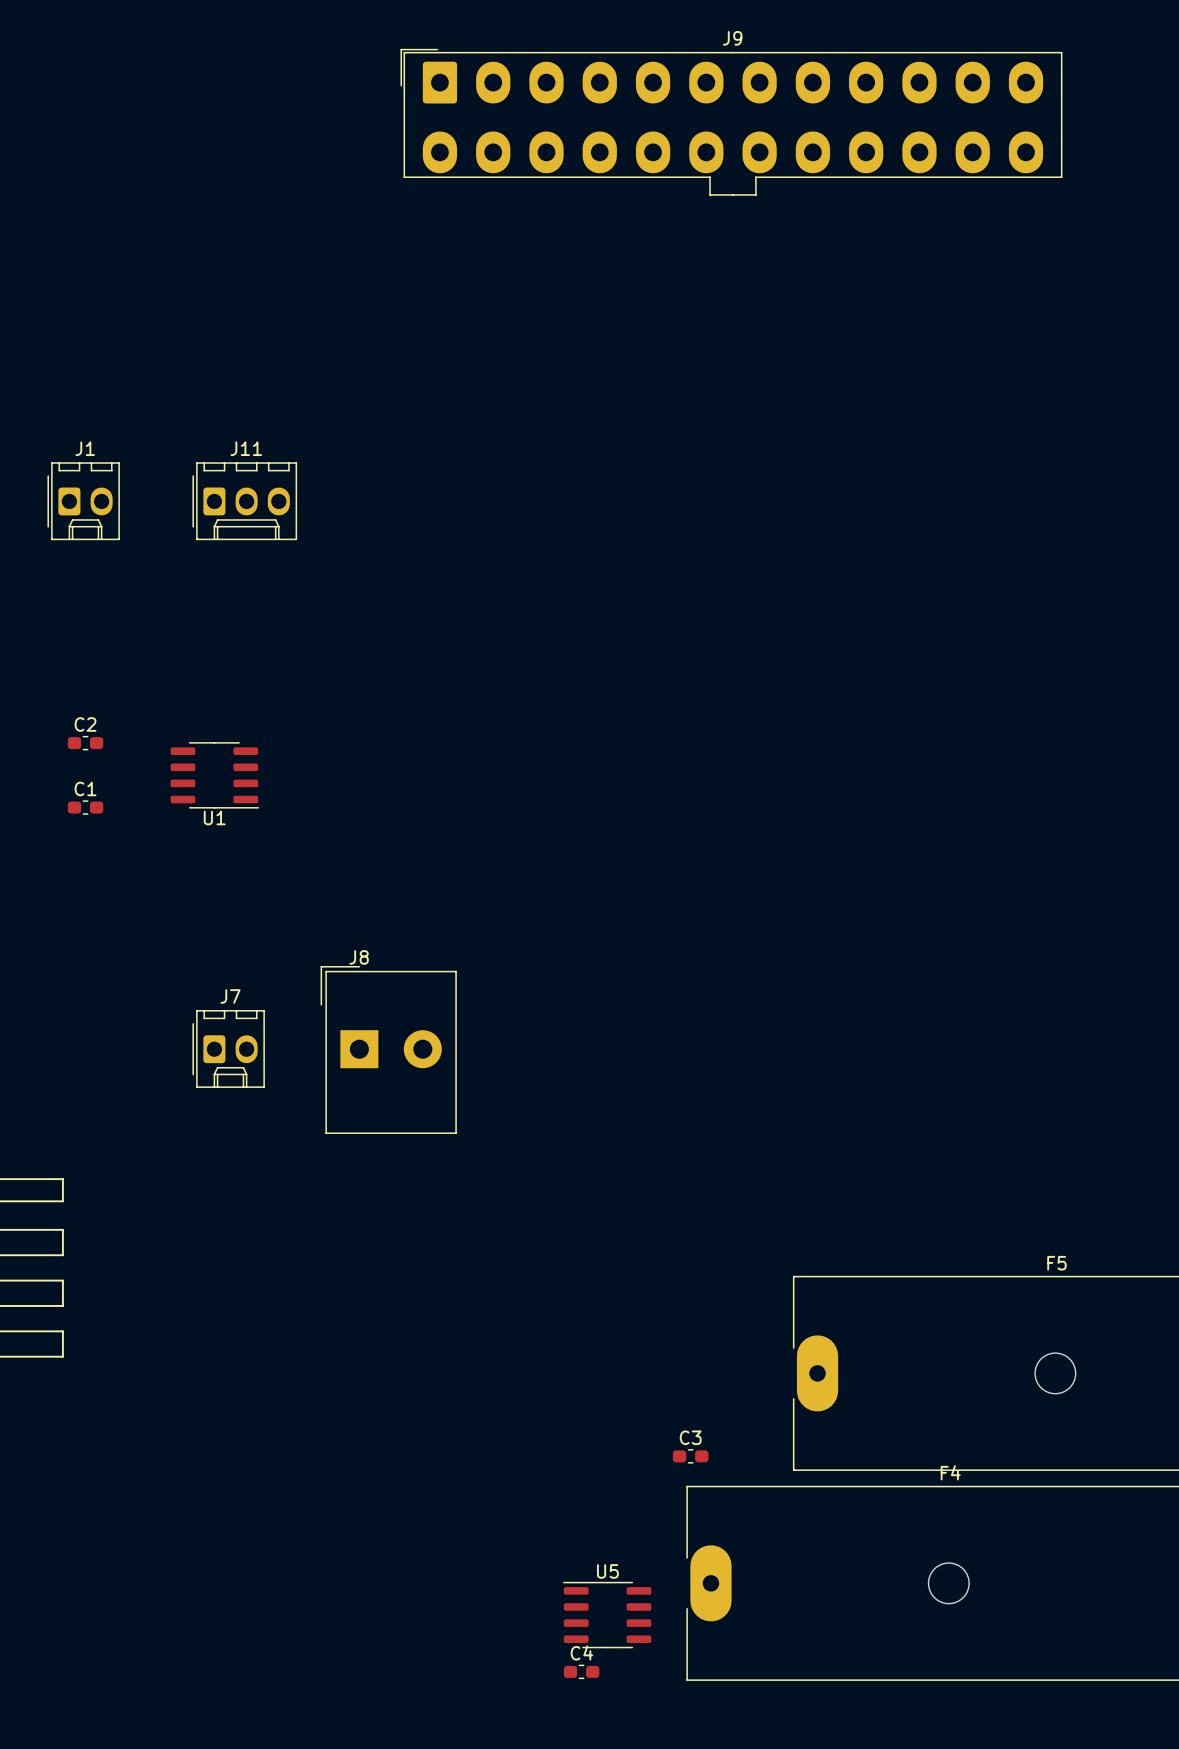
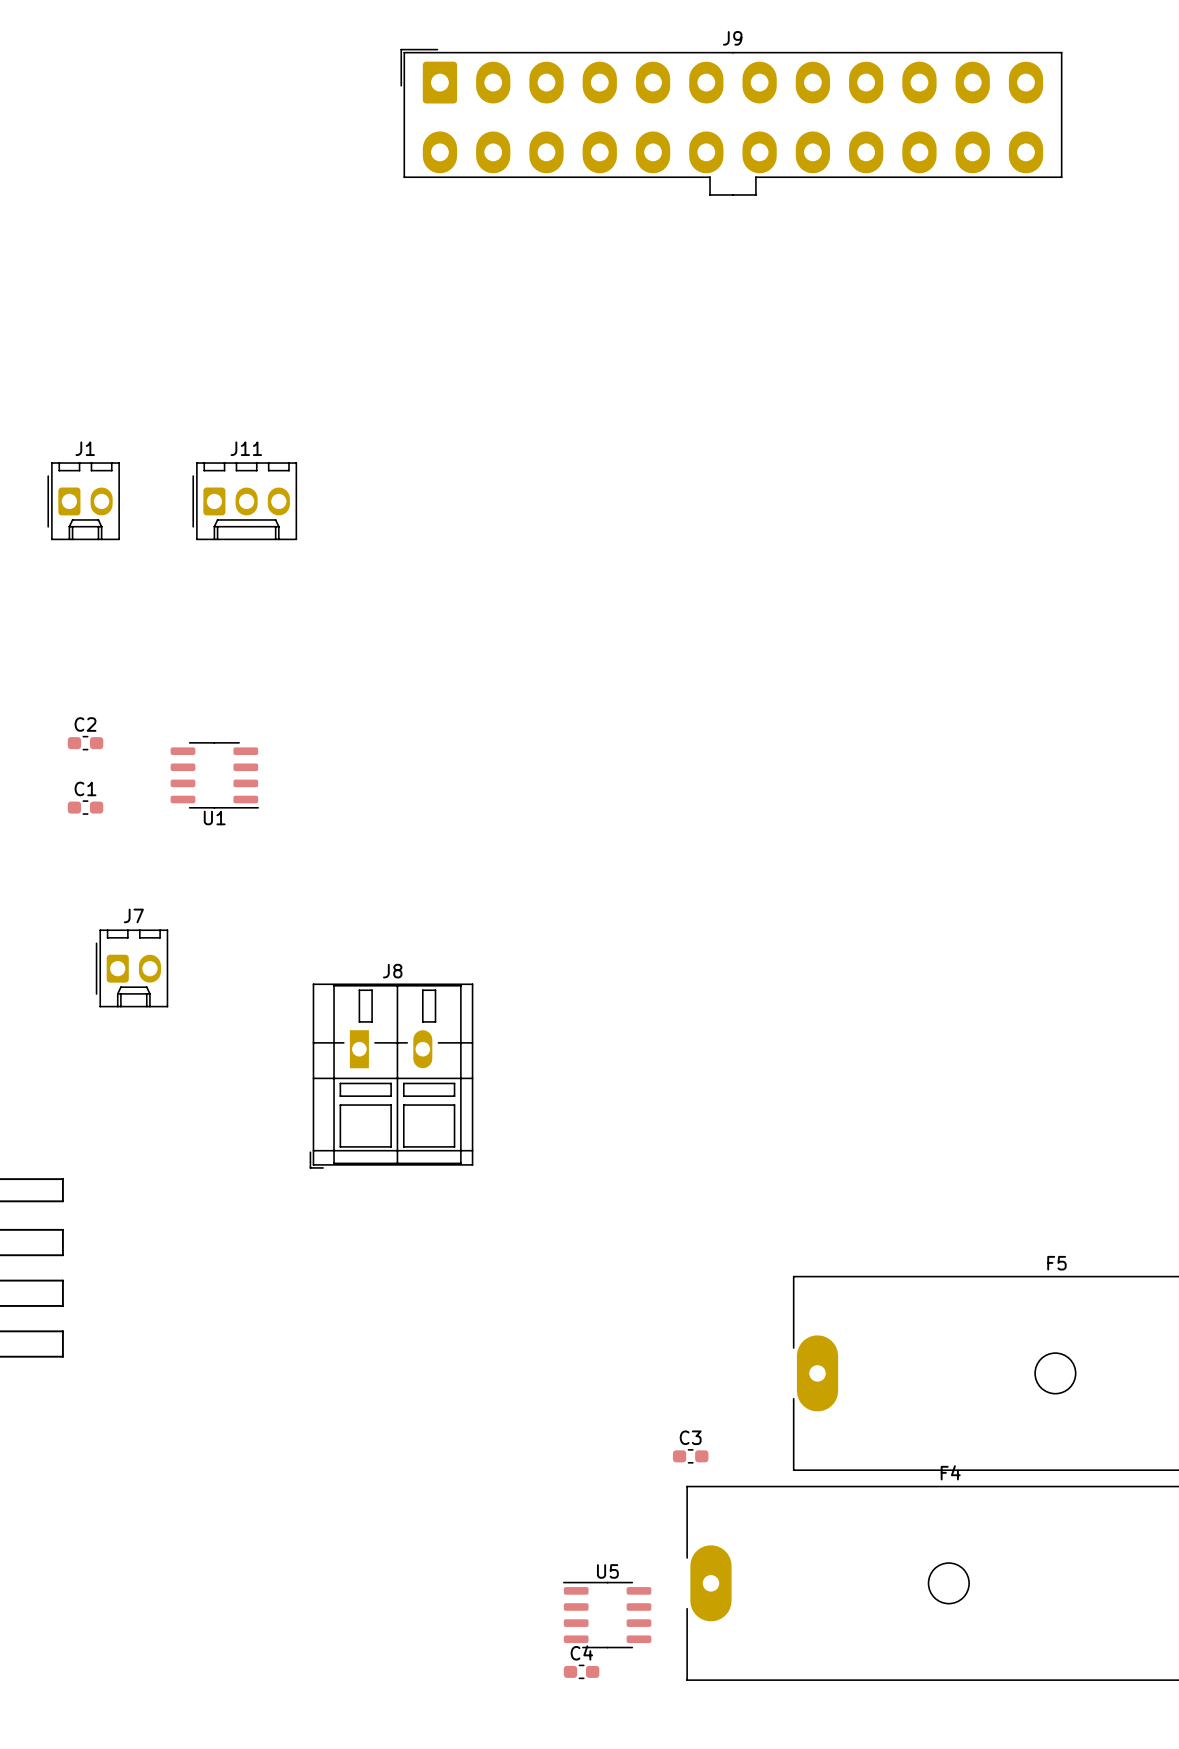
J8 name position: J8 (359, 957) -> J8 (392, 971)
J8 footprint: [320, 966, 457, 1134] -> [309, 983, 474, 1169]
J7 position: (228, 1048) -> (132, 968)

